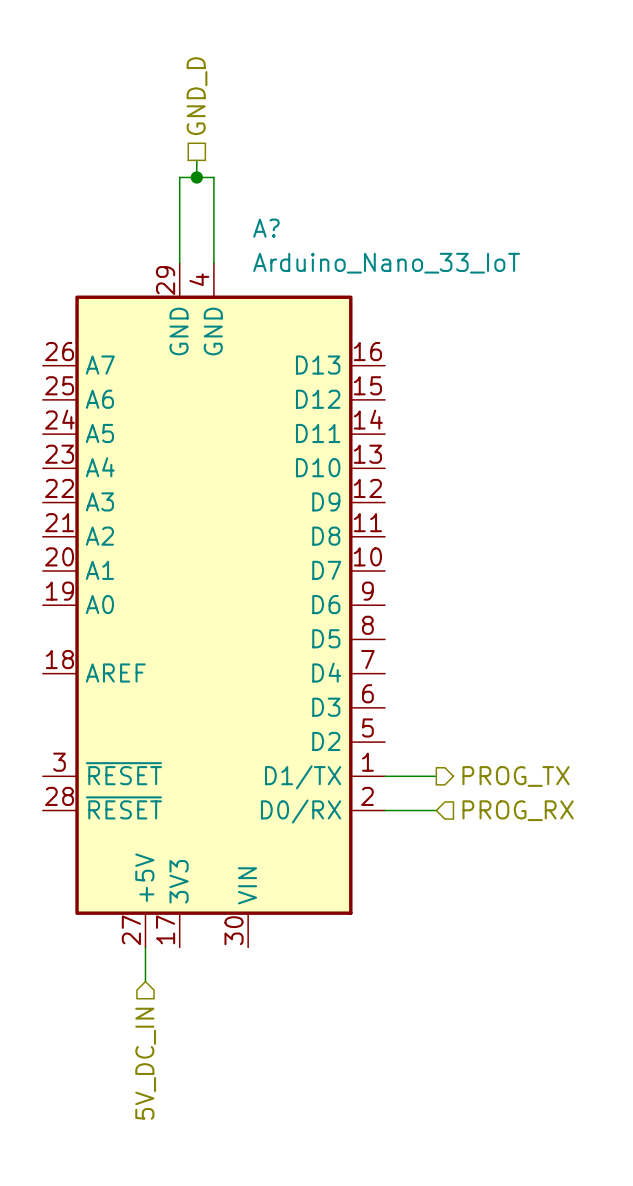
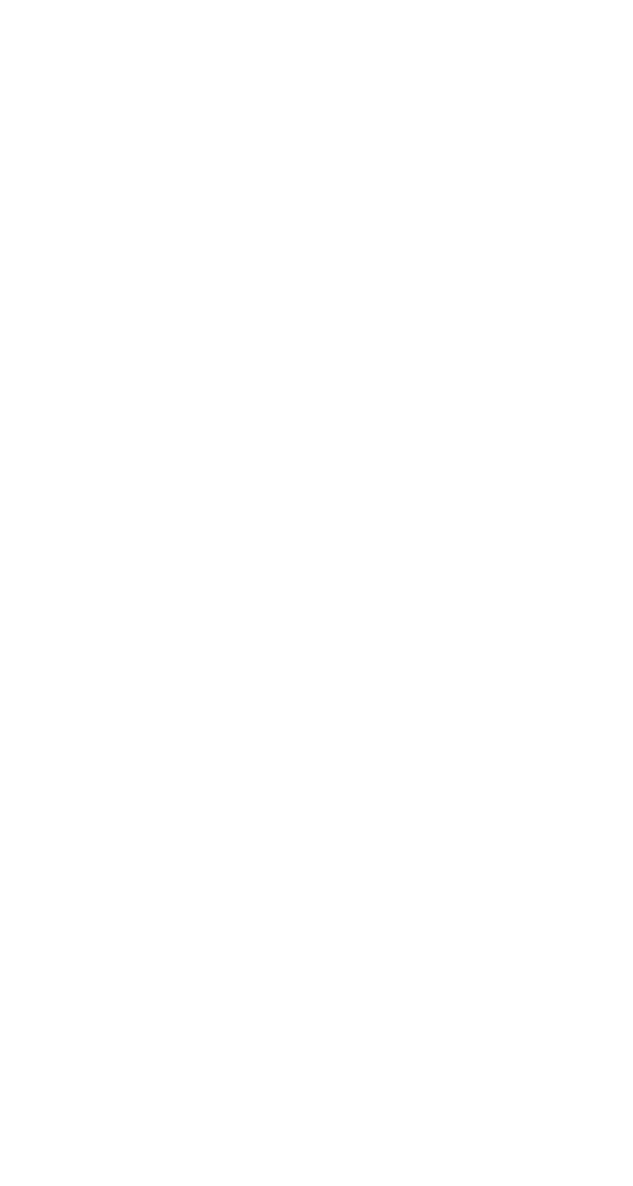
hierarchical label: GND_D (196, 96) -> none
wire: (196, 160) (196, 177) -> none
junction: (196, 177) -> none
wire: (179, 263) (179, 177) (213, 177) (213, 263) -> none
A?: Arduino_Nano_33_IoT (213, 605) -> none
wire: (385, 776) (436, 776) -> none
hierarchical label: PROG_TX (516, 776) -> none
wire: (385, 810) (436, 810) -> none
hierarchical label: PROG_RX (518, 810) -> none
wire: (145, 947) (145, 981) -> none
hierarchical label: 5V_DC_IN (145, 1063) -> none

